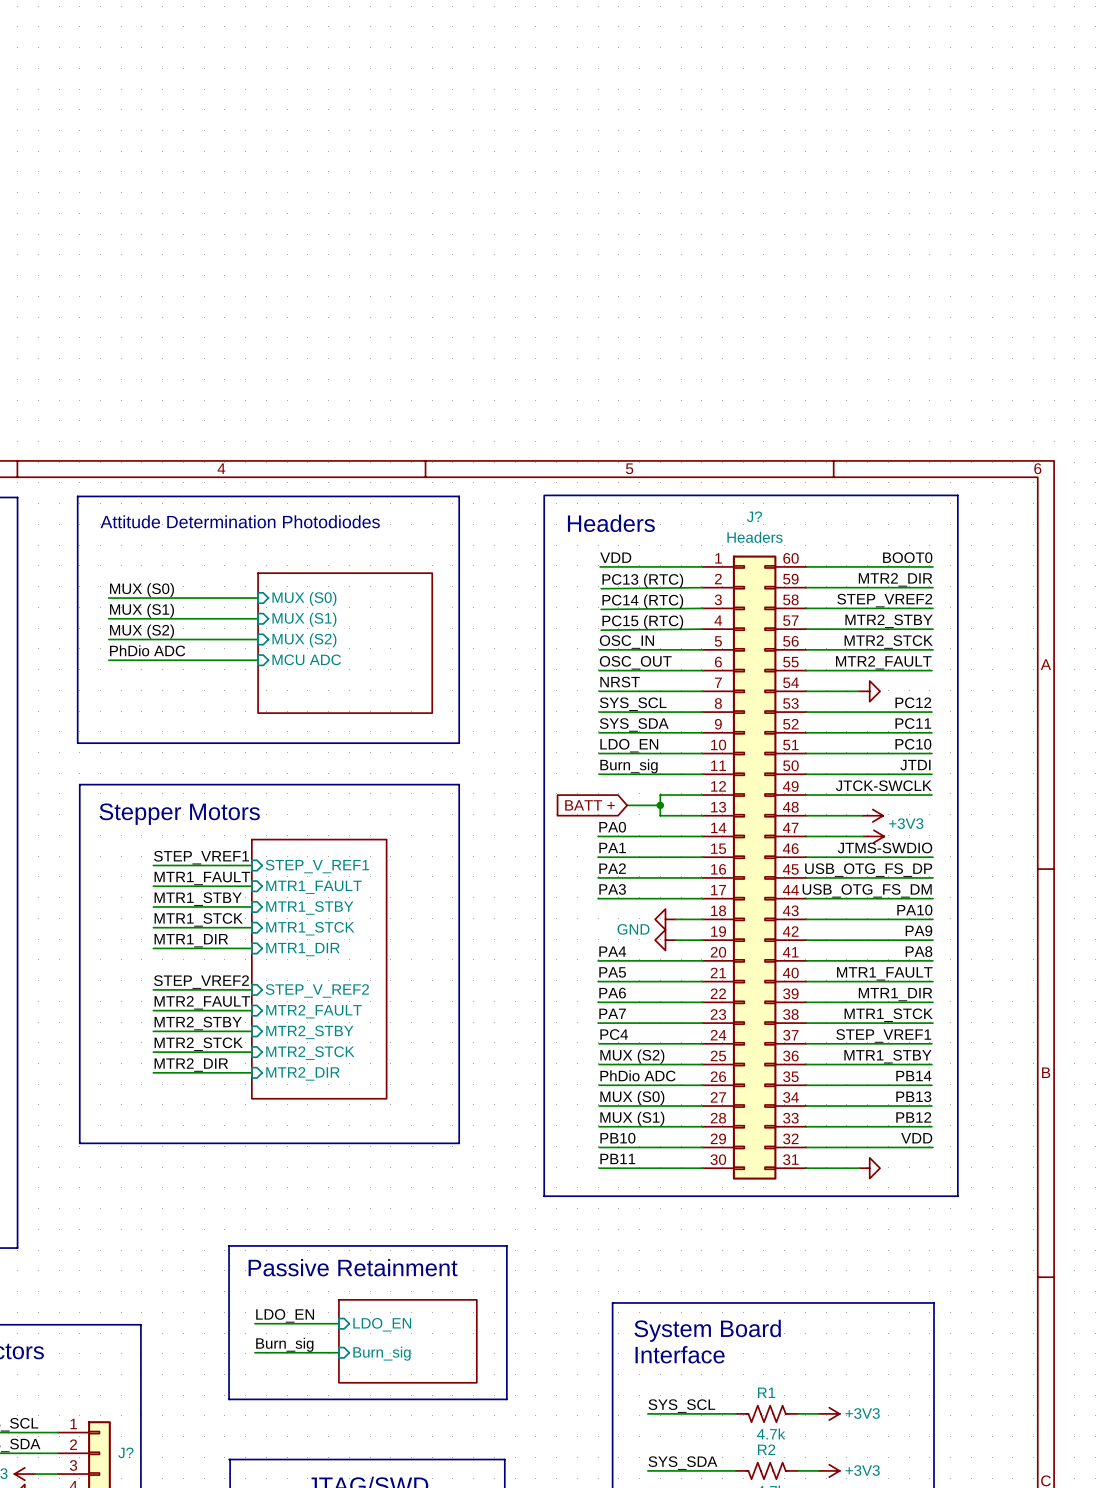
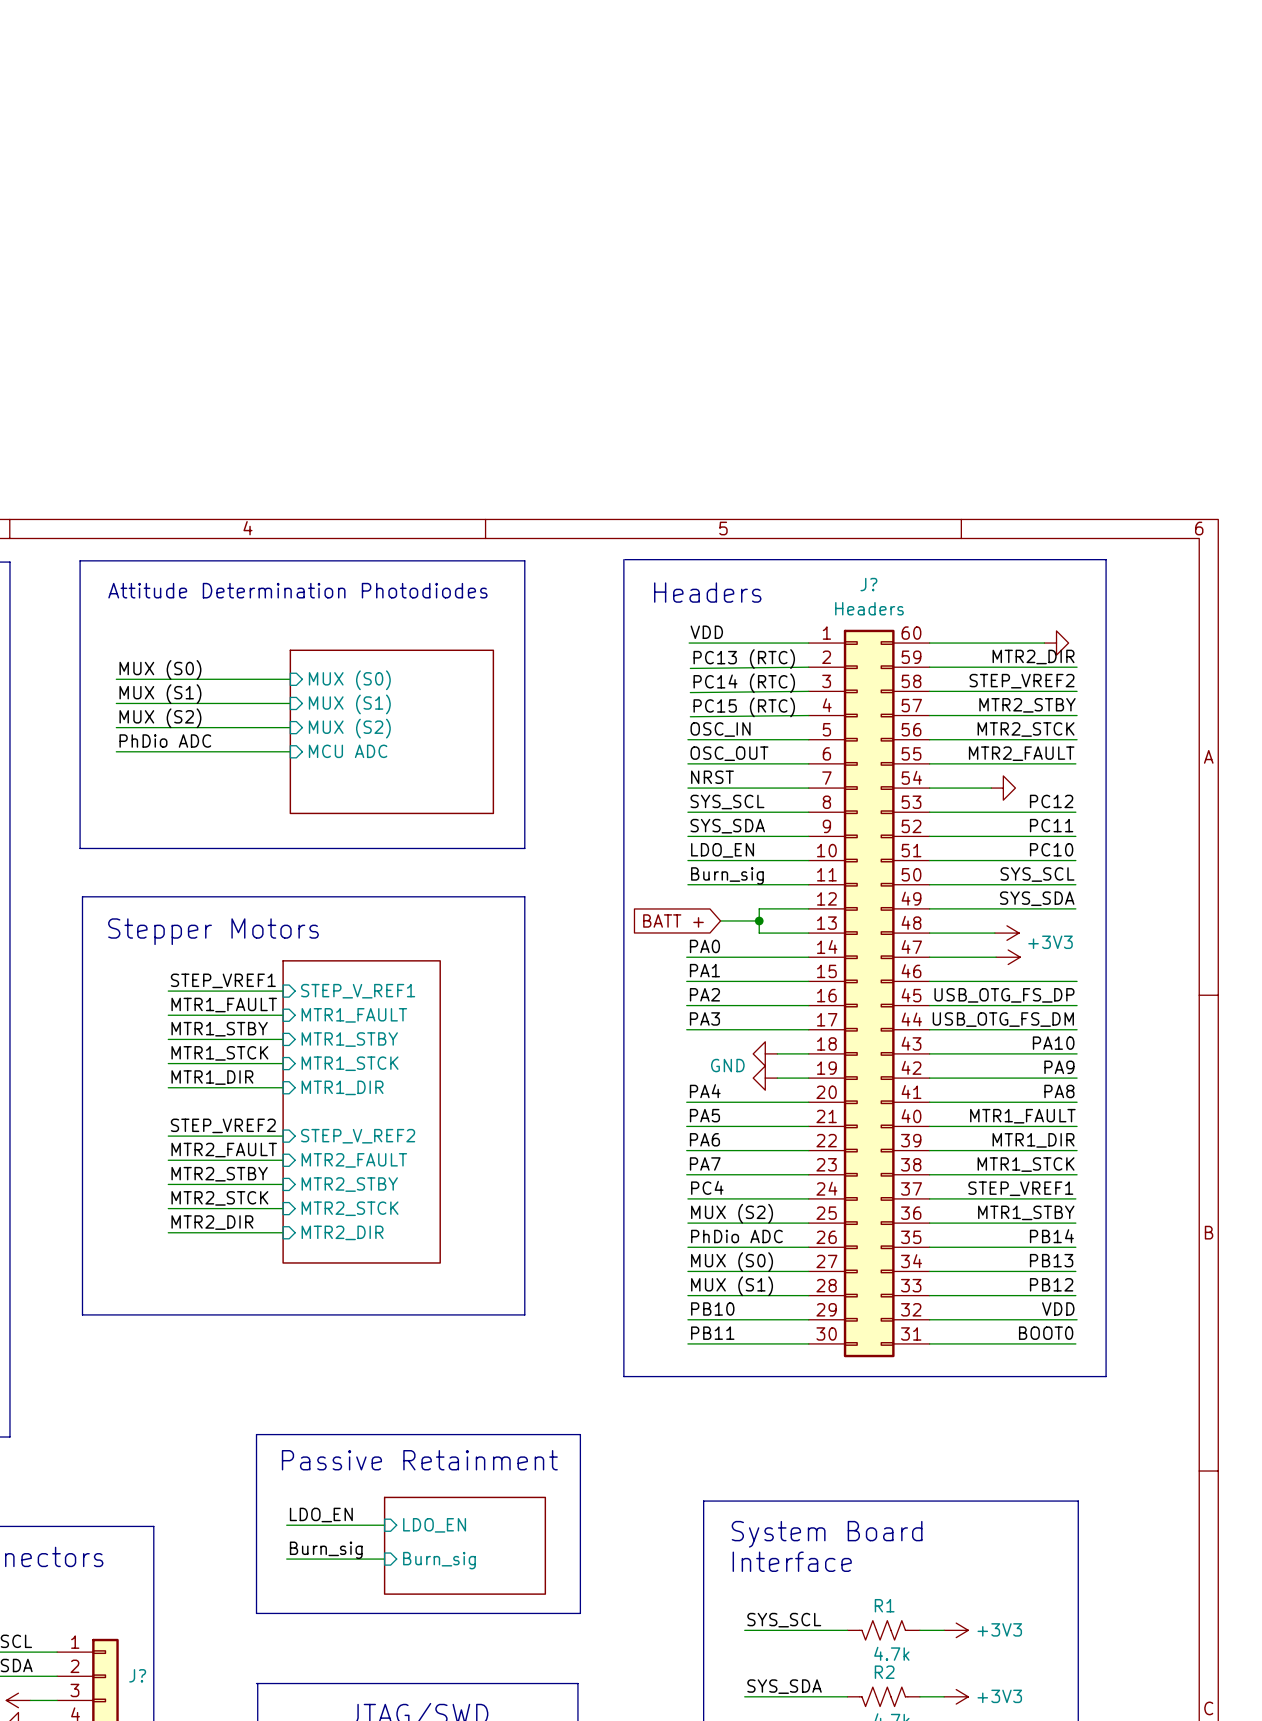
label: BOOT0 (907, 557) -> none
wire: (904, 566) (932, 566) -> none
power symbol: none -> (1056, 643)
label: JTDI (915, 765) -> SYS_SCL (1037, 874)
label: JTCK-SWCLK (883, 785) -> SYS_SDA (1037, 898)
label: JTMS-SWDIO (885, 847) -> none
label: none -> BOOT0 (1046, 1333)
wire: none -> (991, 1343) (1075, 1343)
power symbol: (869, 1168) -> none

